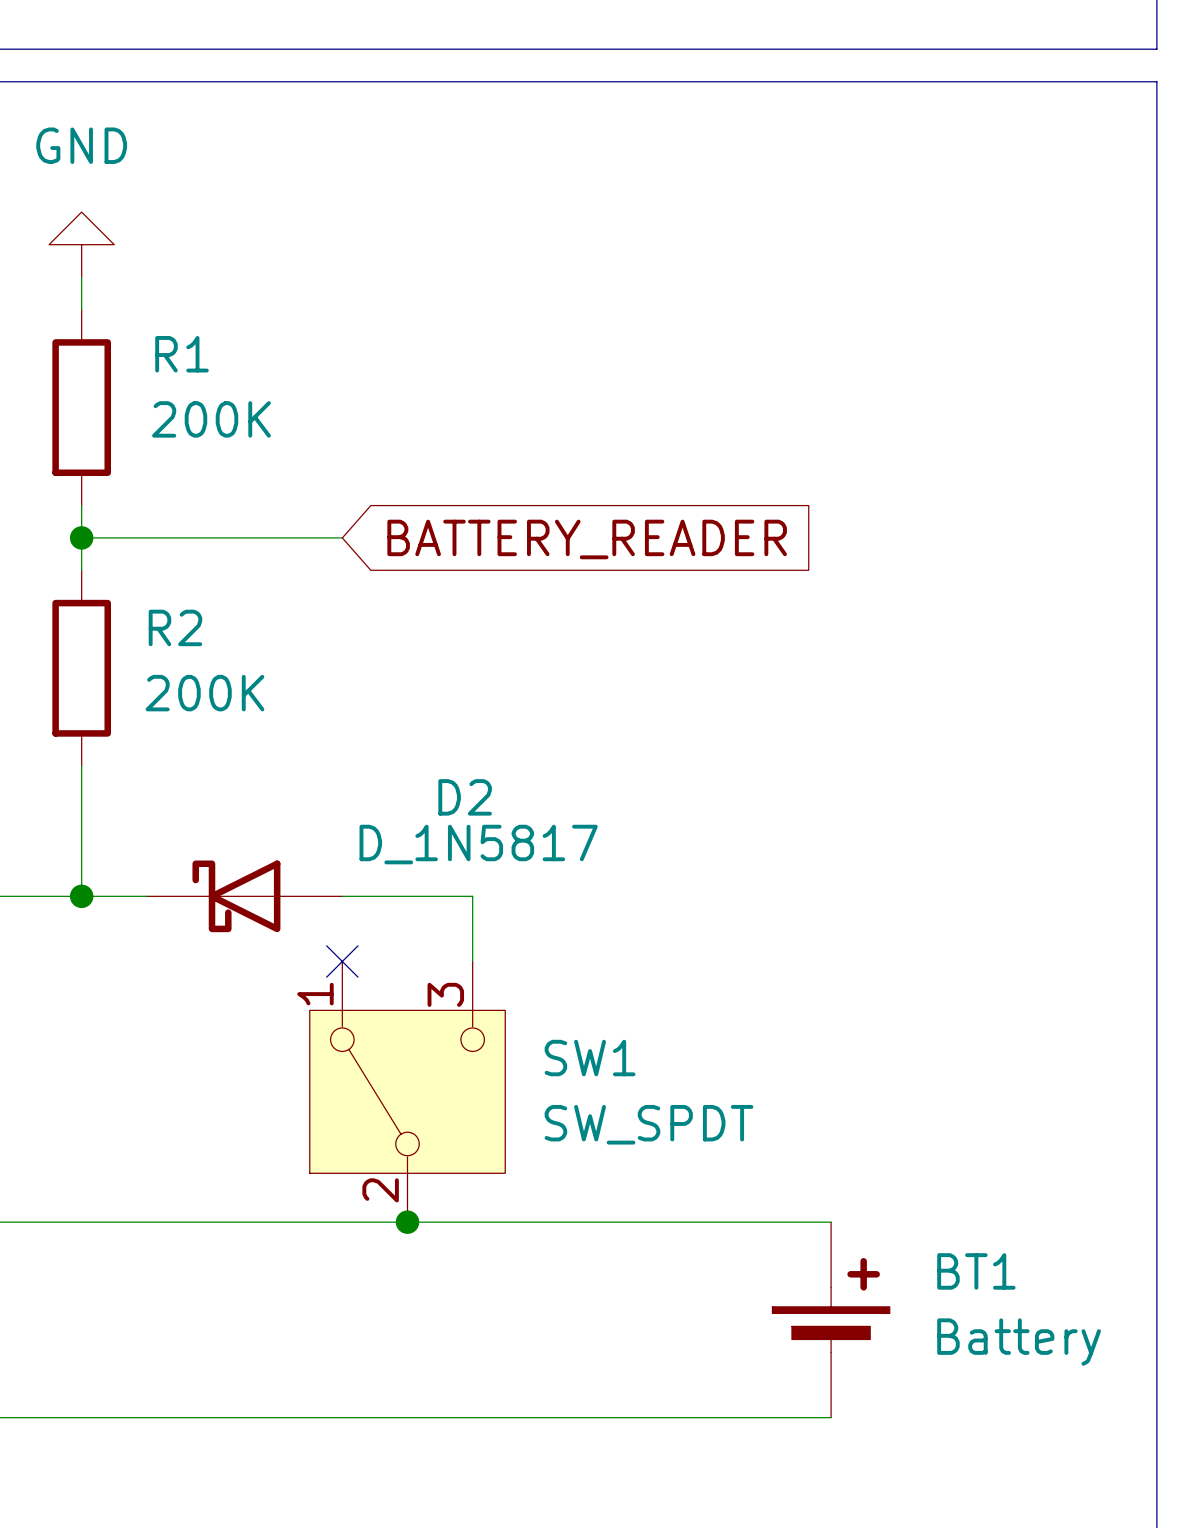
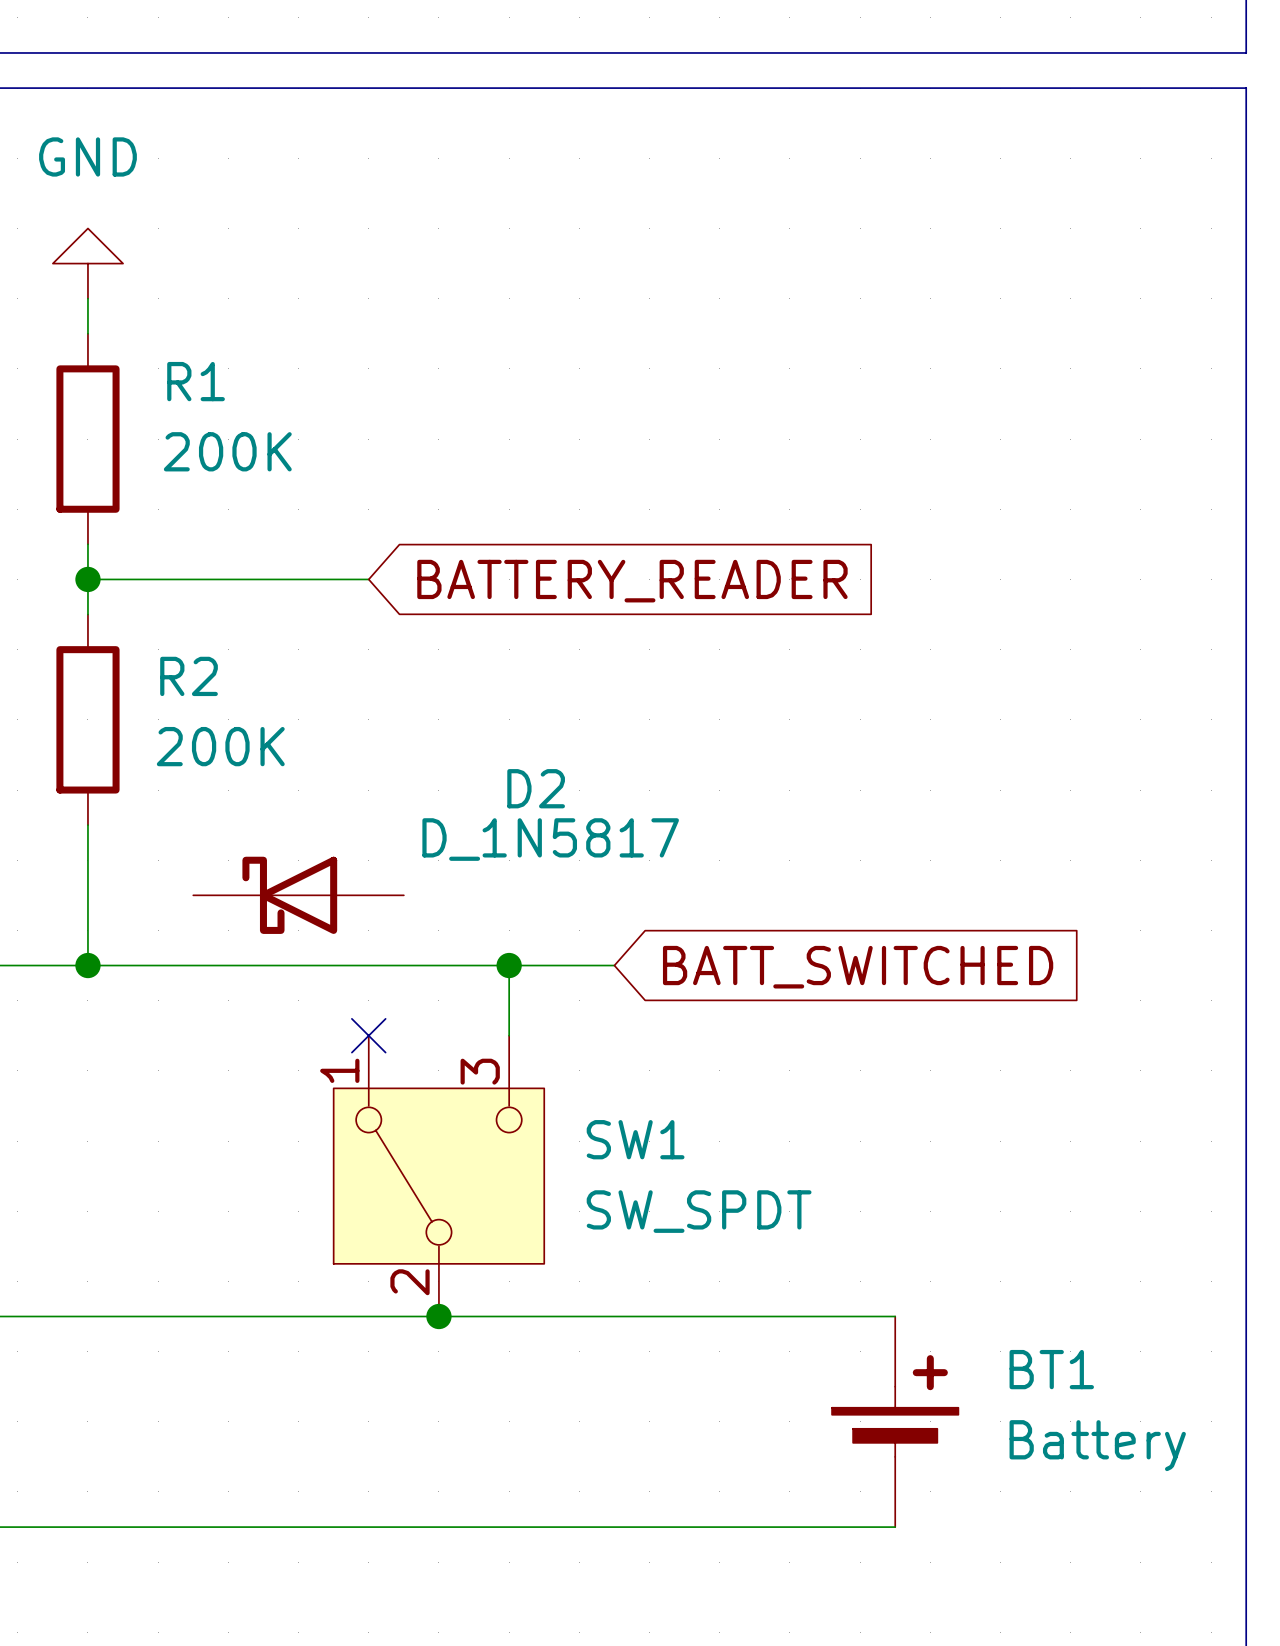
D2 position: (244, 896) -> (298, 895)
wire: none -> (509, 965) (614, 965)
junction: none -> (509, 965)
global label: none -> BATT_SWITCHED (858, 967)

